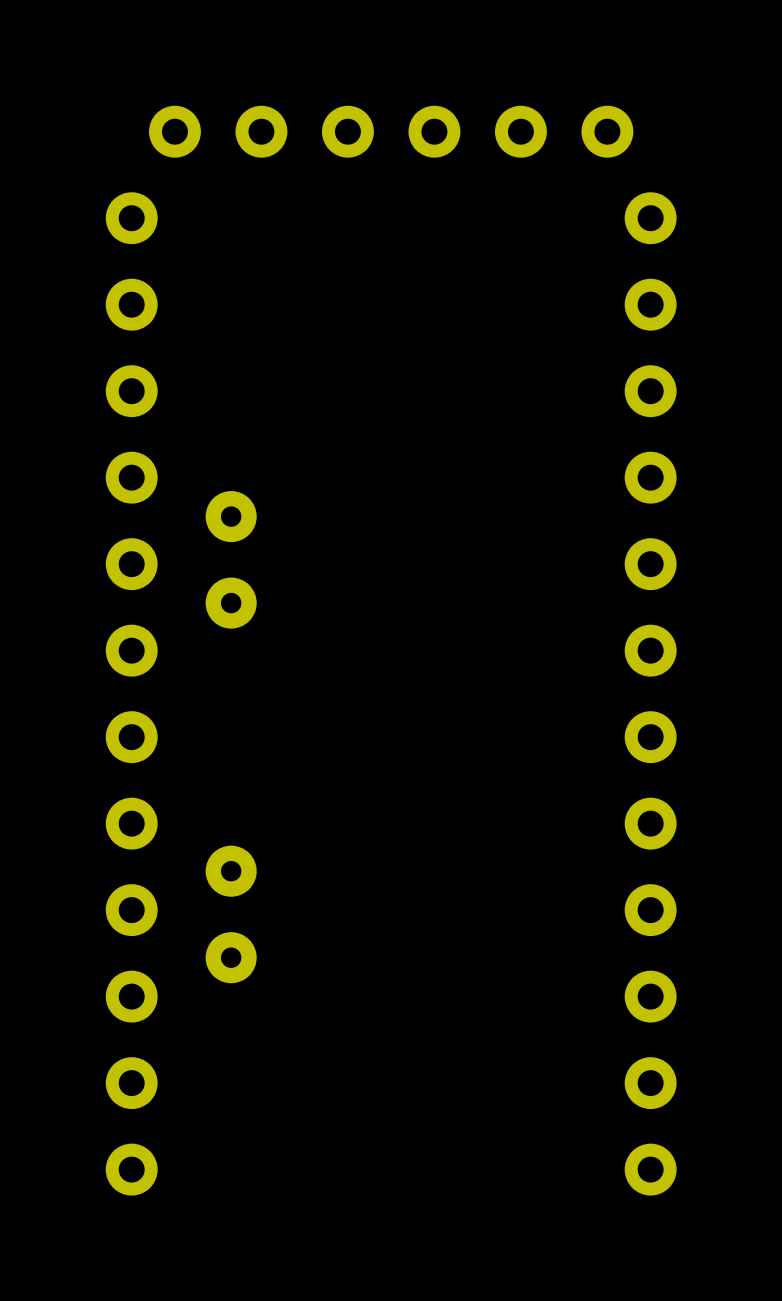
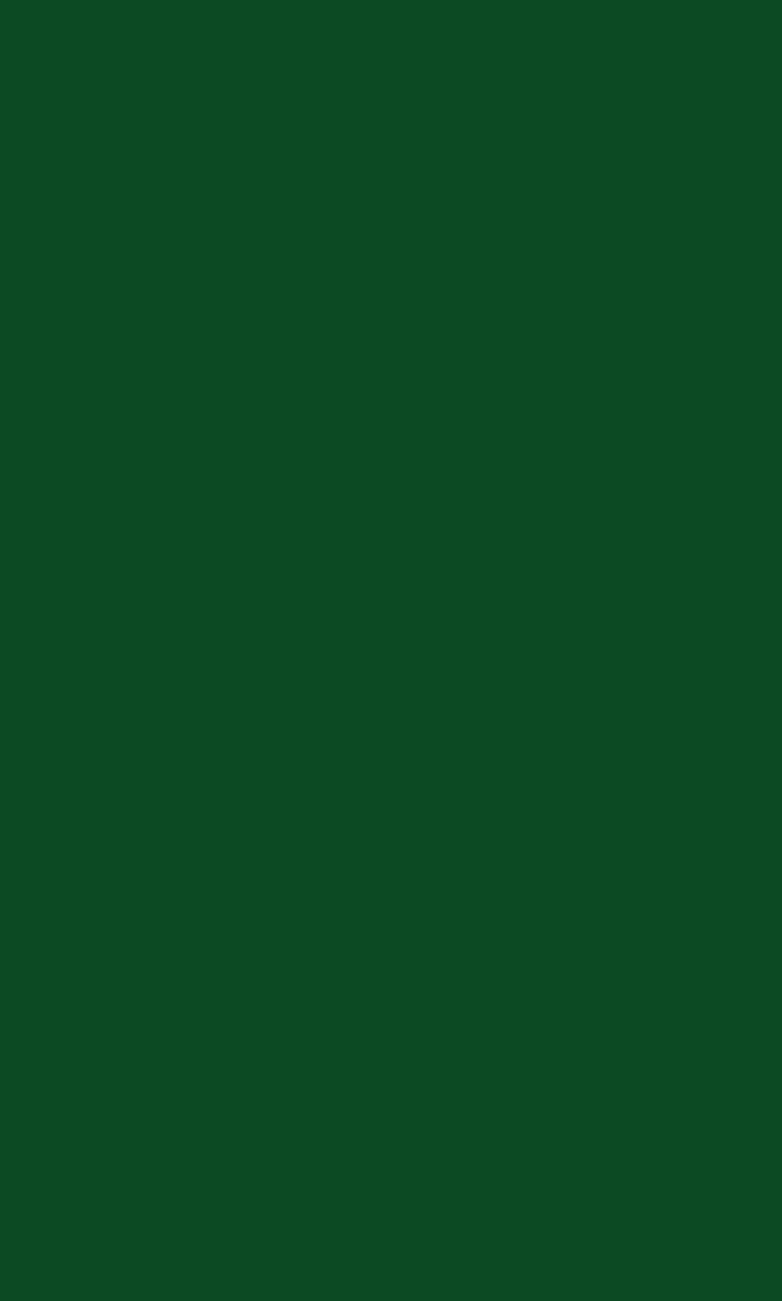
part: (391, 650) -> none

